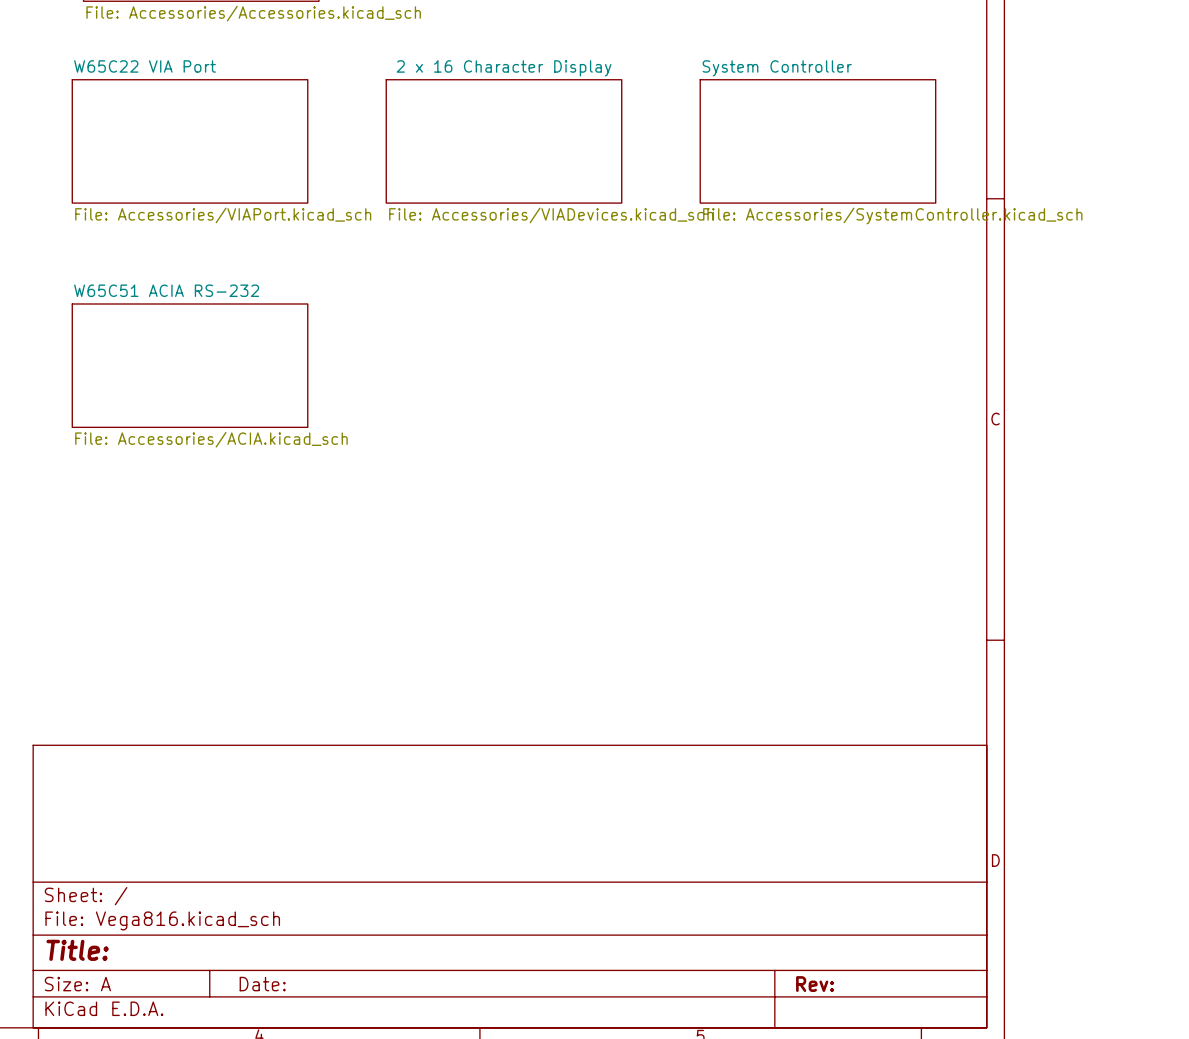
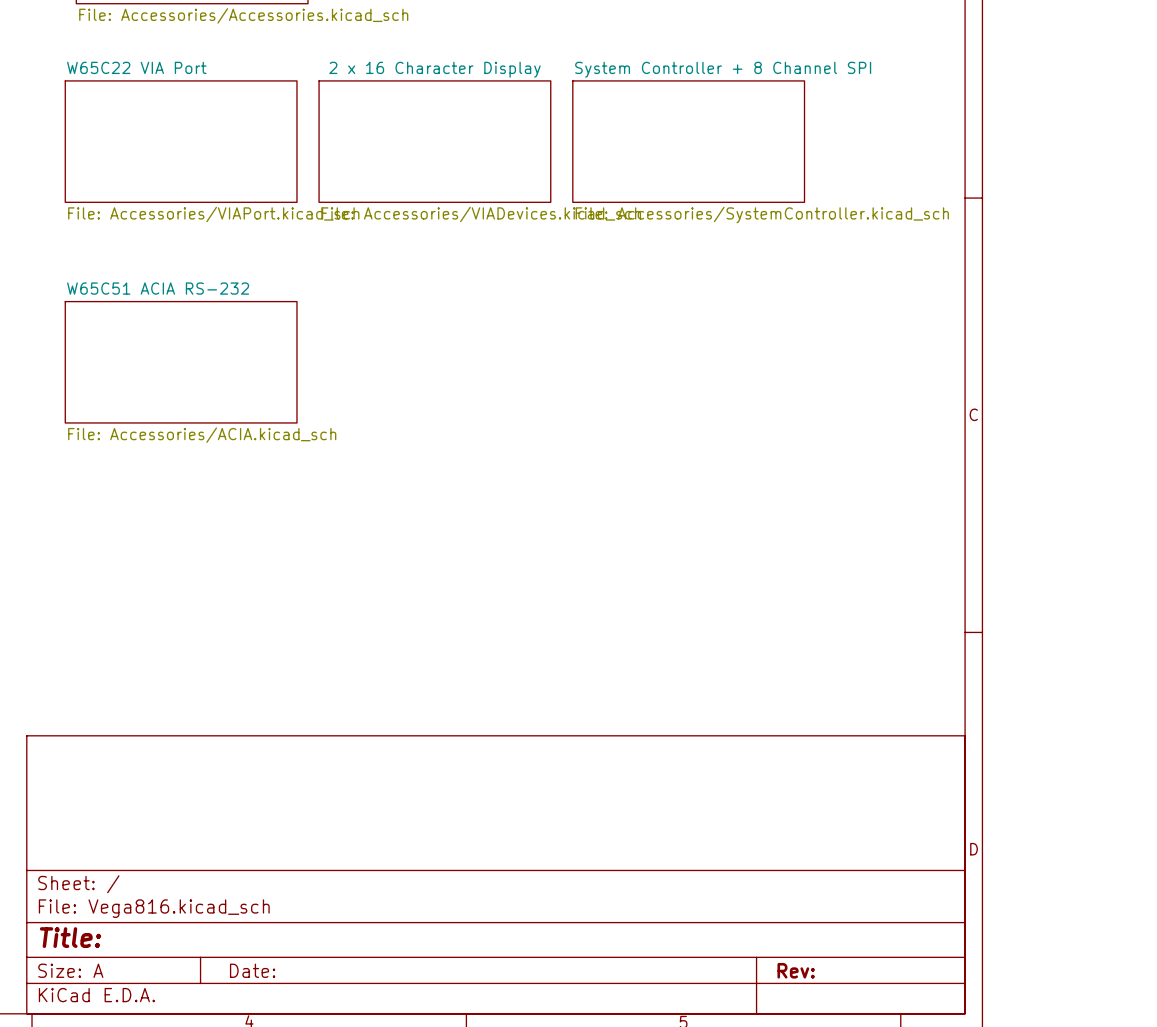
sheet 2 x 16 Character Display position: (503, 141) -> (434, 141)
sheet System Controller + 8 Channel SPI: none -> File: Accessories/SystemController.kicad_sch (688, 141)
sheet System Controller: File: Accessories/SystemController.kicad_sch (817, 141) -> none

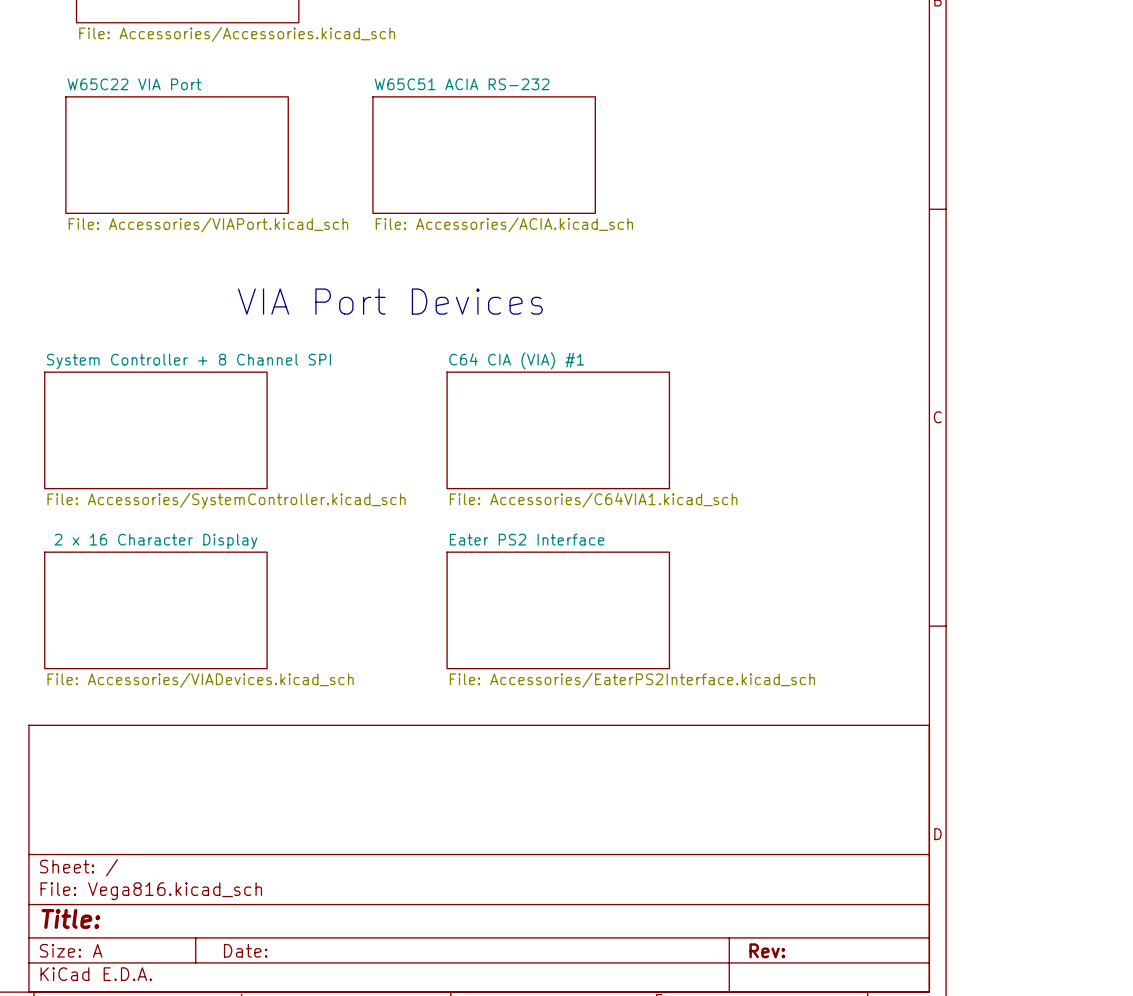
sheet 2 x 16 Character Display position: (434, 141) -> (155, 610)
sheet System Controller + 8 Channel SPI position: (688, 141) -> (155, 430)
text: none -> VIA Port Devices (390, 301)
sheet W65C51 ACIA RS-232 position: (181, 362) -> (484, 155)
sheet C64 CIA (VIA) #1: none -> File: Accessories/C64VIA1.kicad_sch (558, 430)
sheet Eater PS2 Interface: none -> File: Accessories/EaterPS2Interface.kicad_sch (558, 610)

